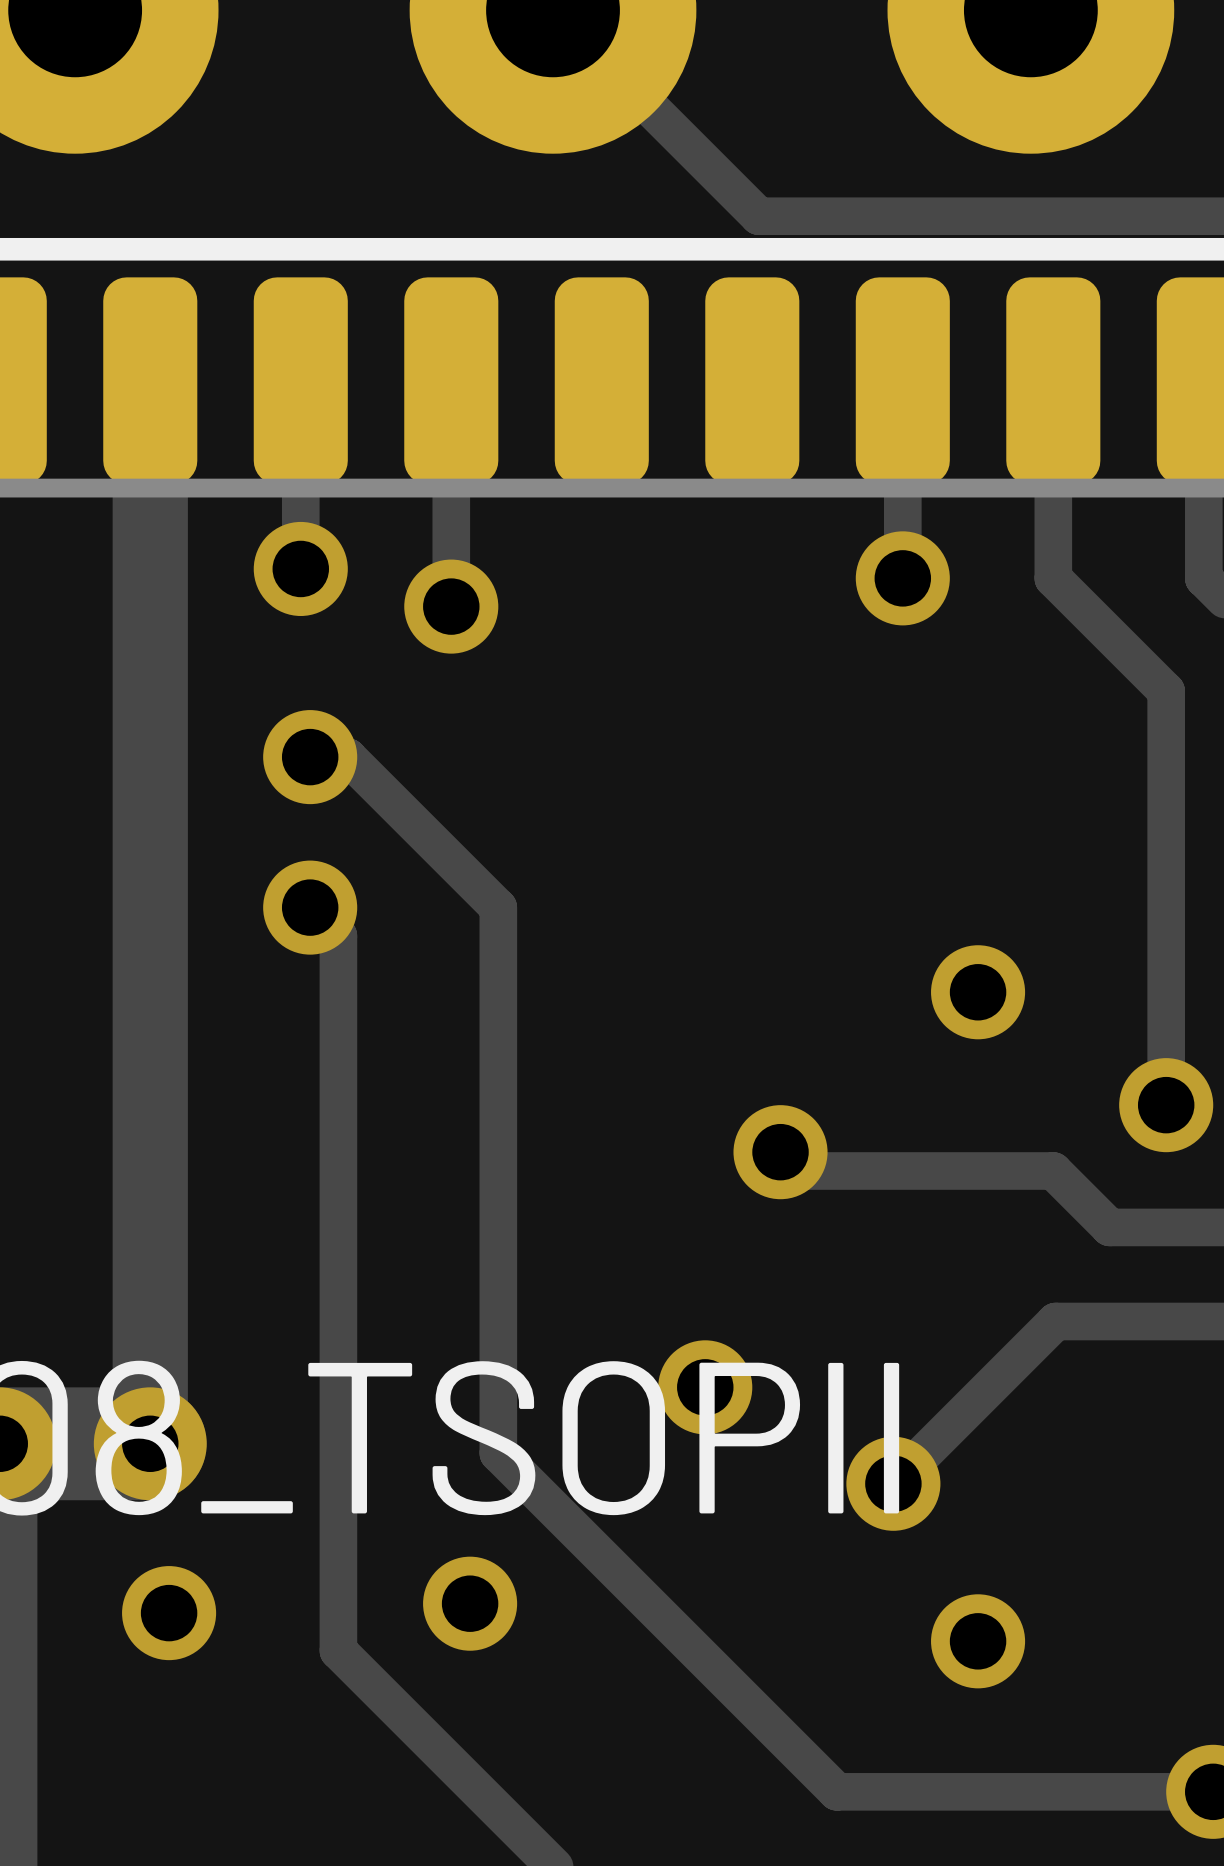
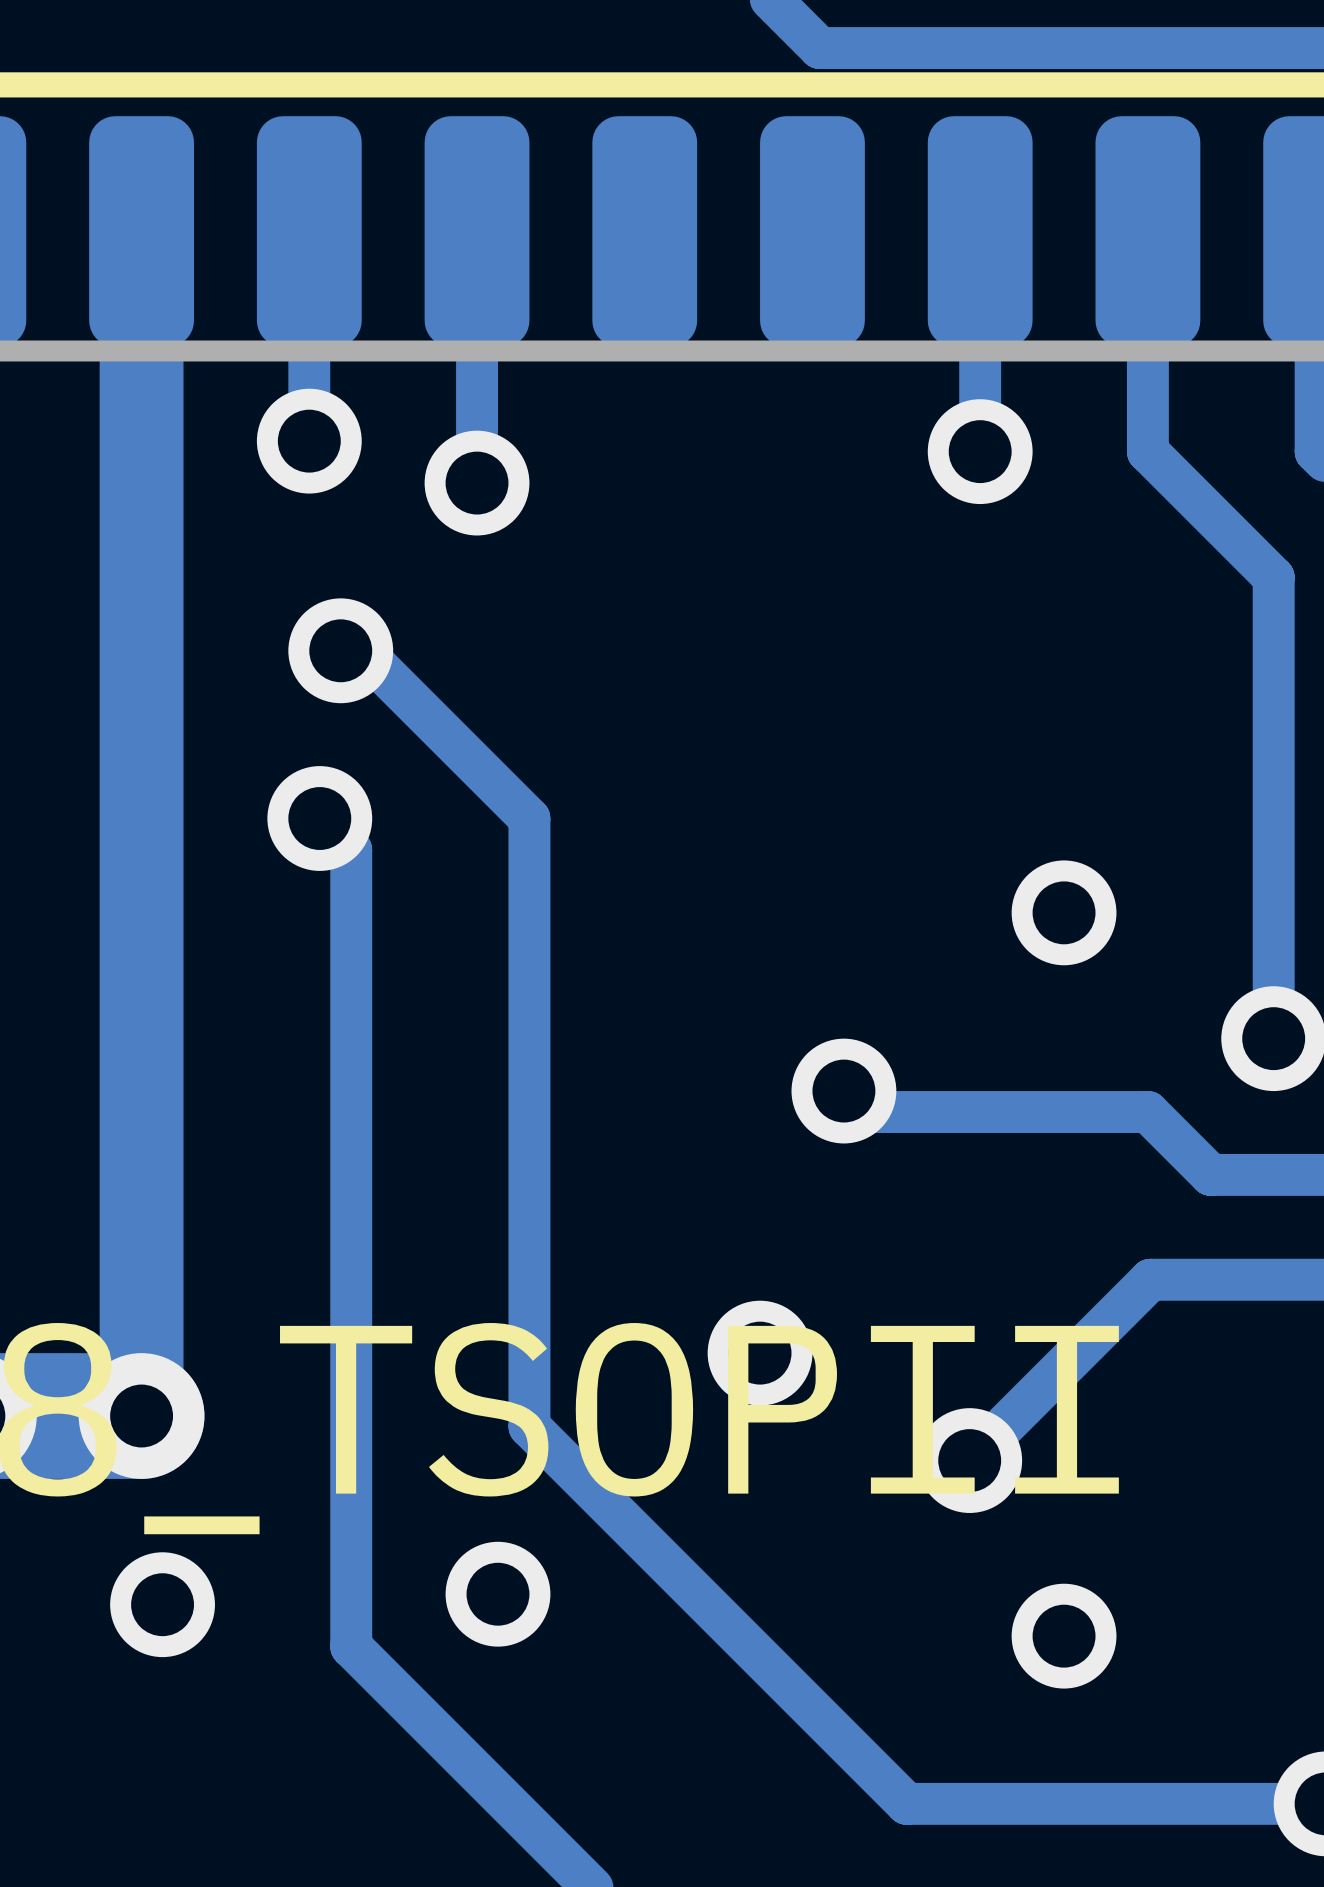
via position: (310, 757) -> (340, 650)

